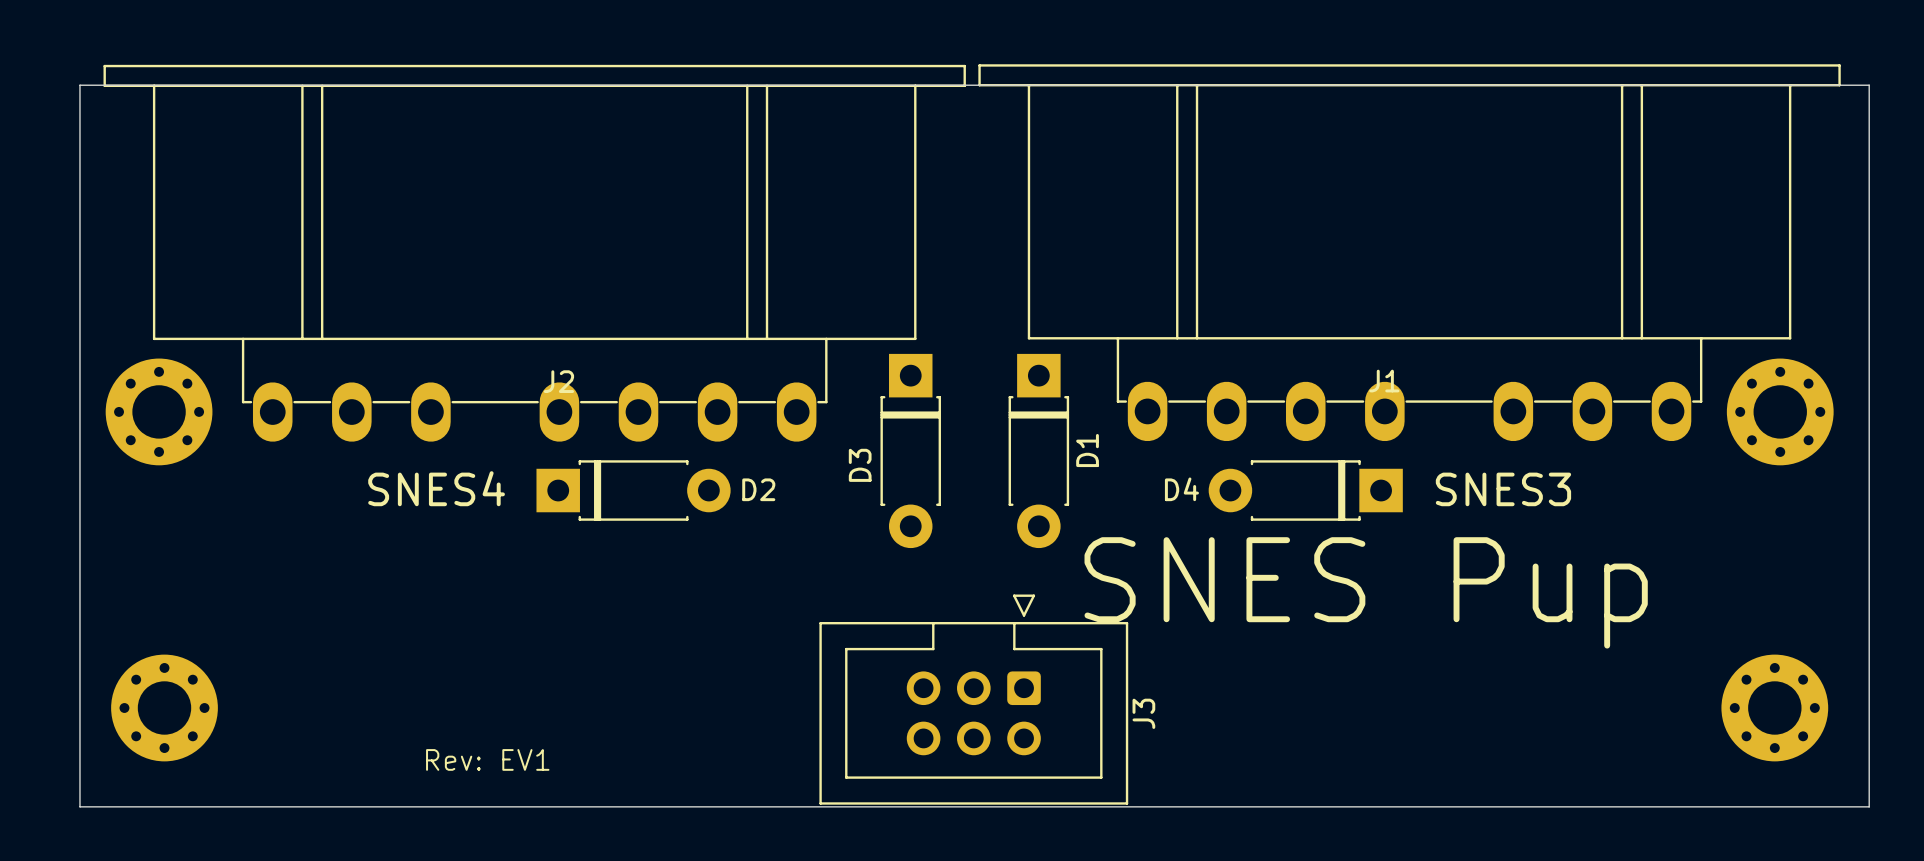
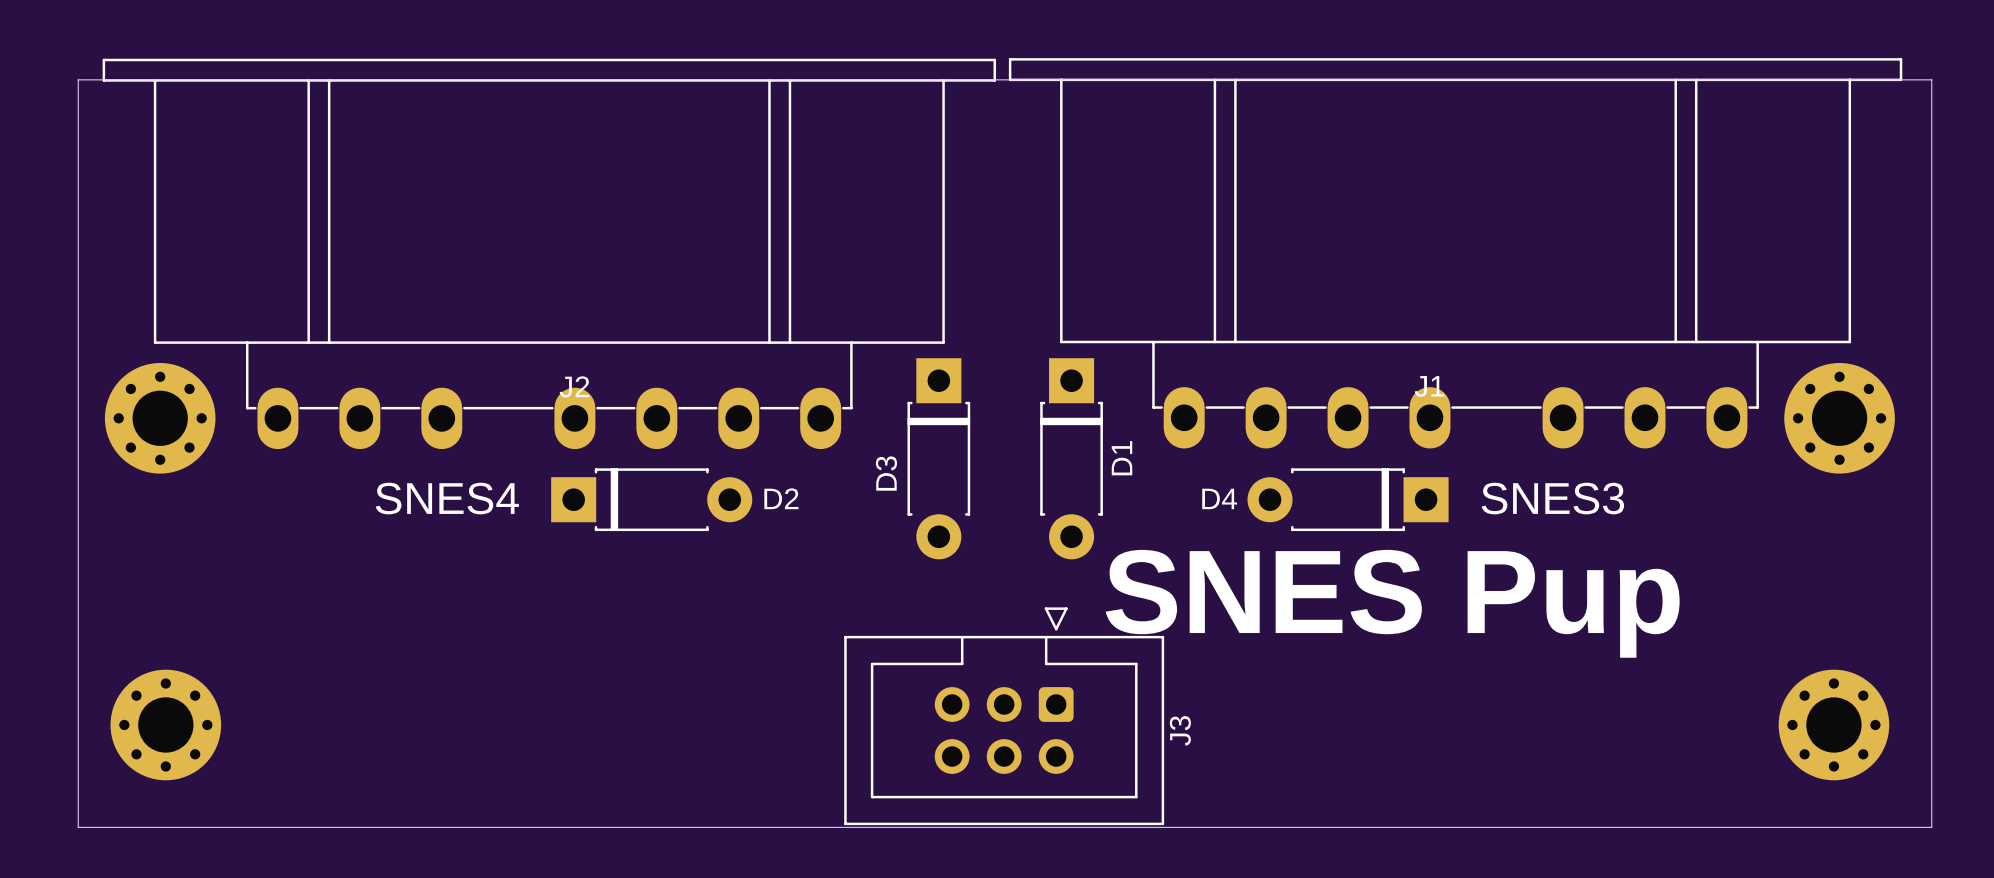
text: Rev: EV1 (487, 759) -> none

